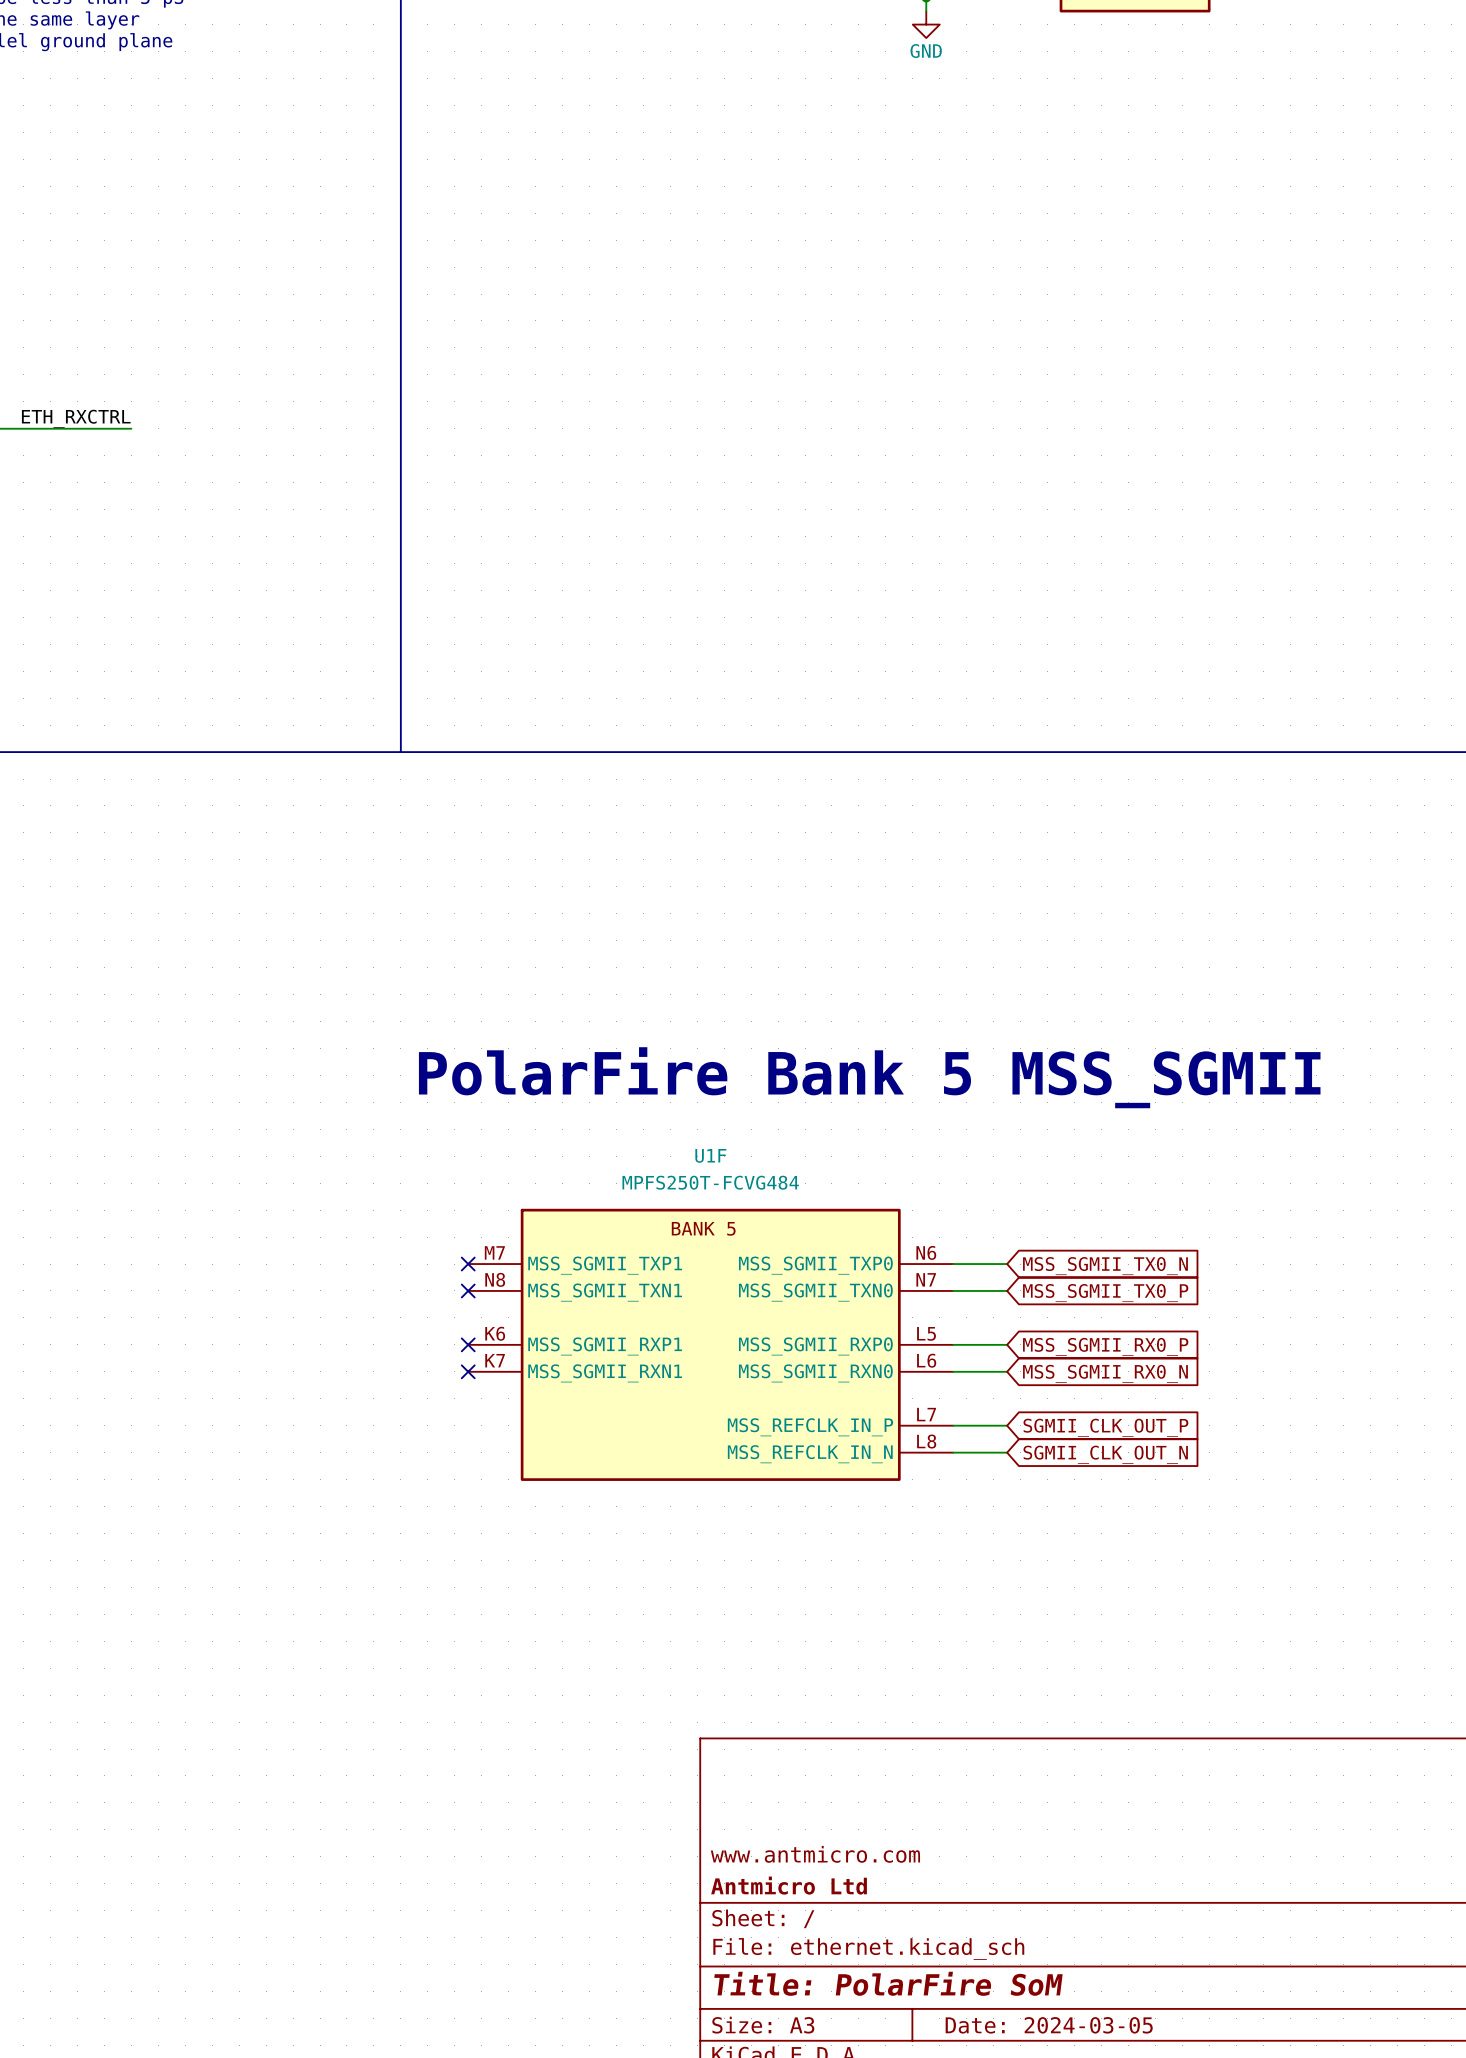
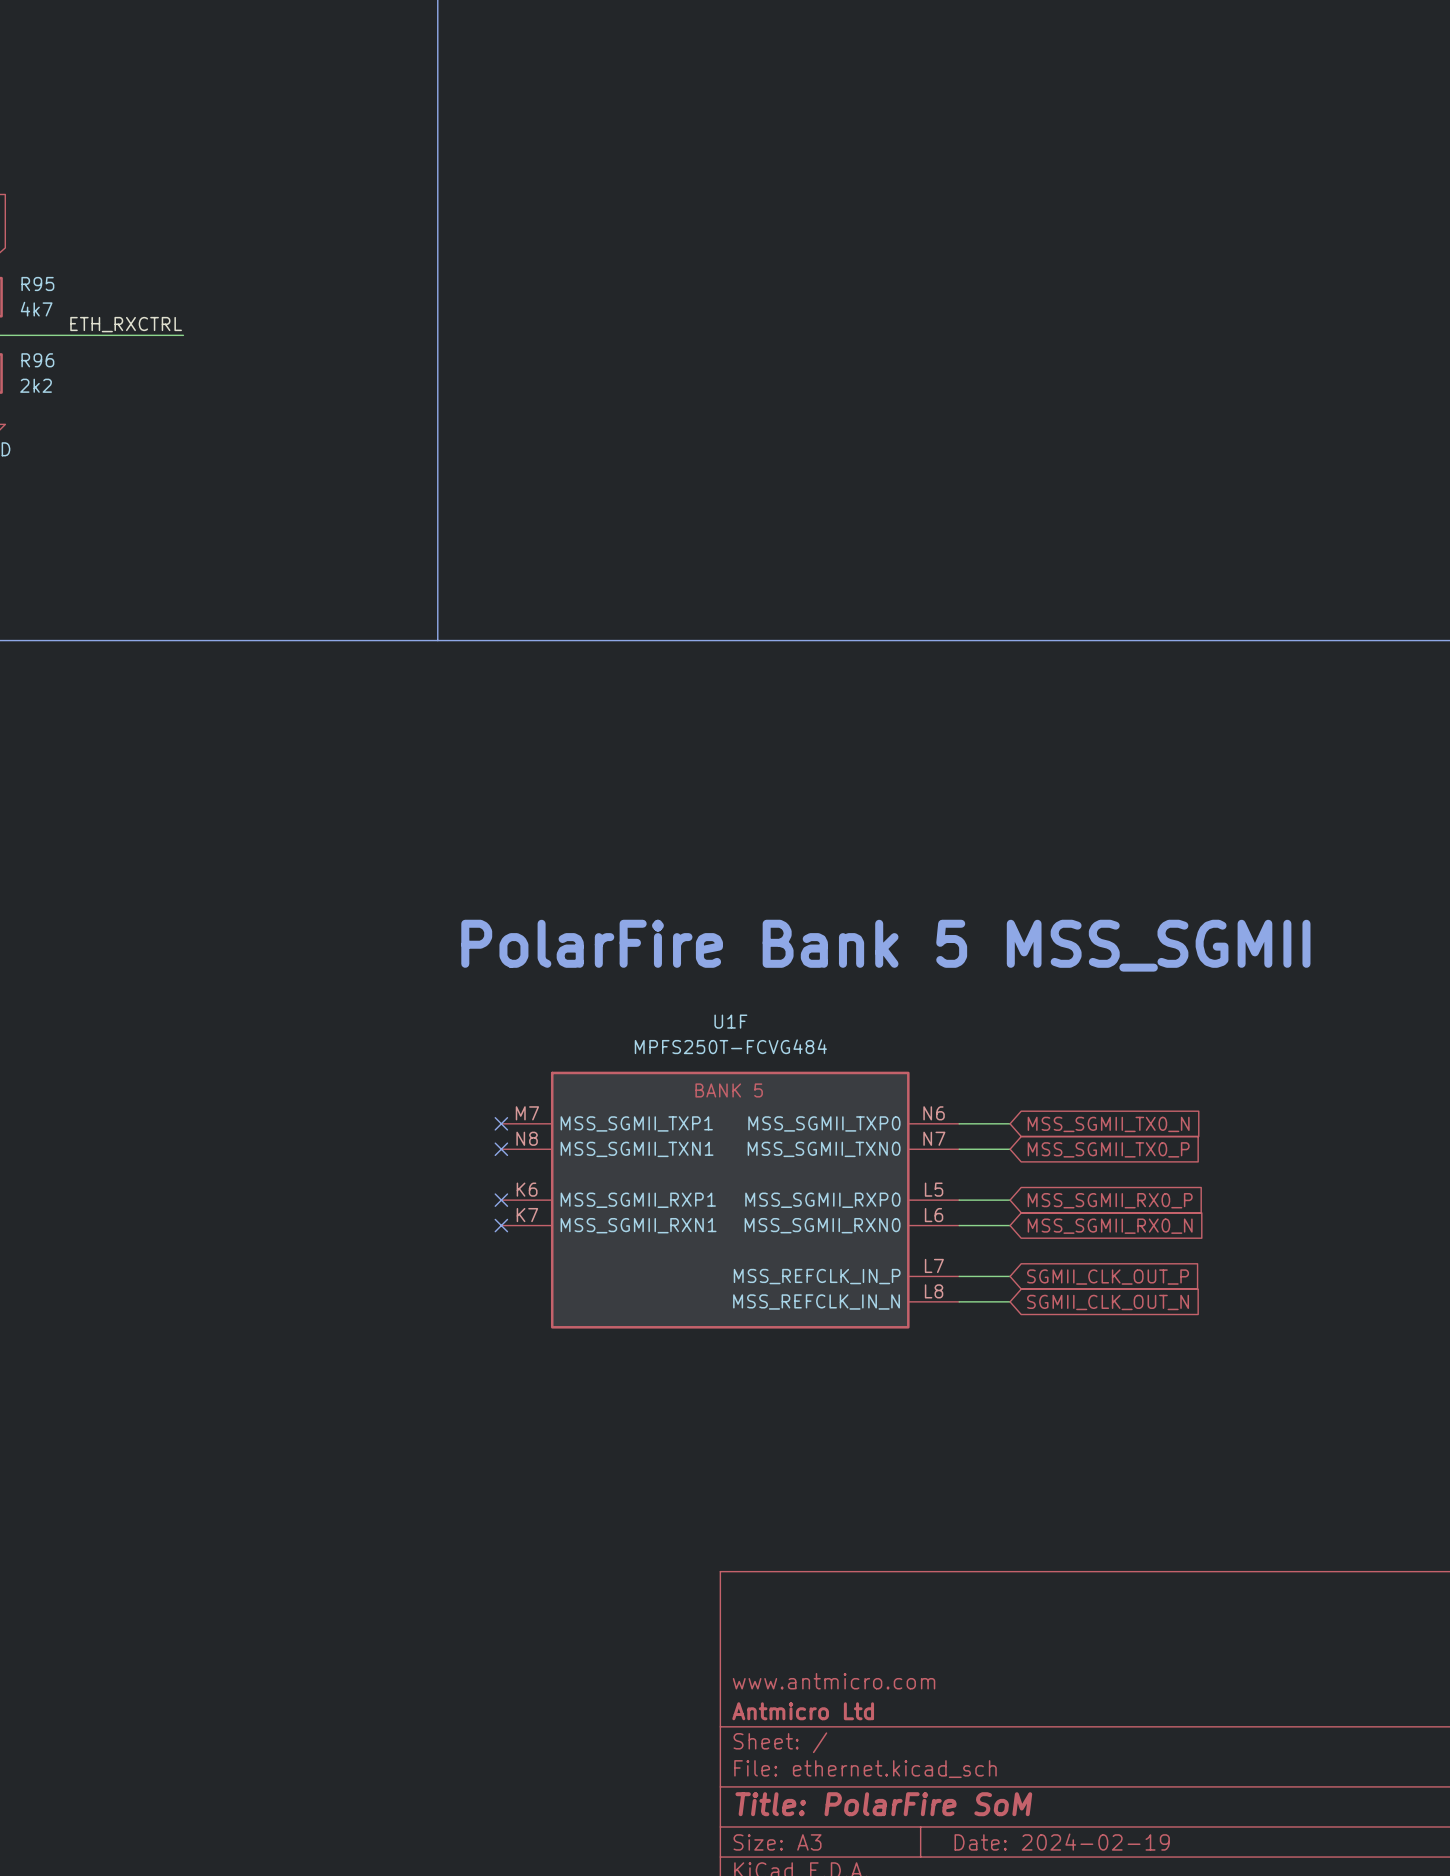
title block: Date: 2024-03-05 (1049, 2025) -> Date: 2024-02-19 (1062, 1842)

